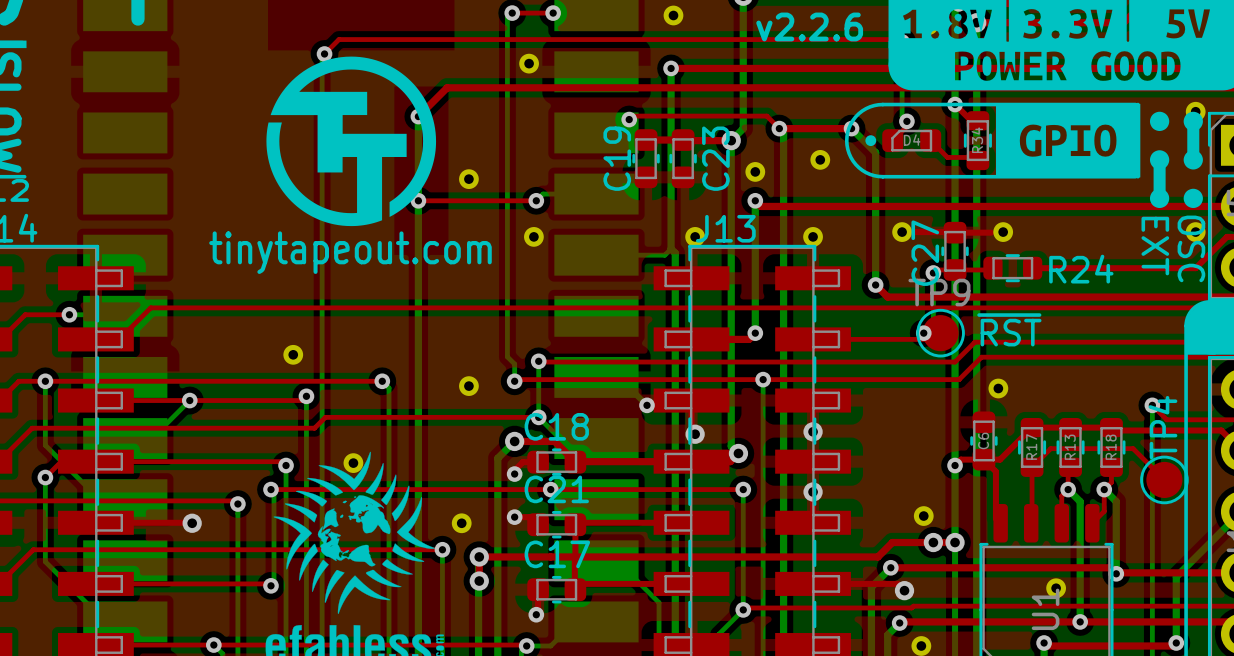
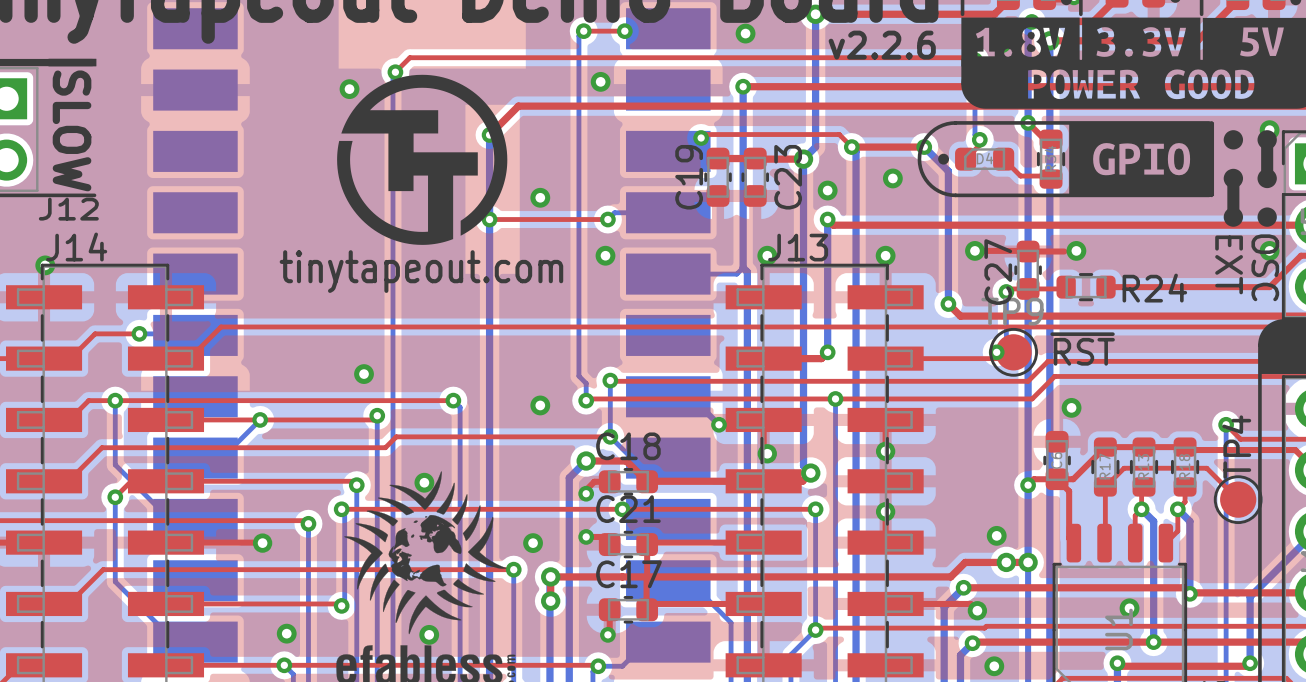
part: none -> (349, 89)
part: none -> (286, 633)
part: none -> (429, 634)

